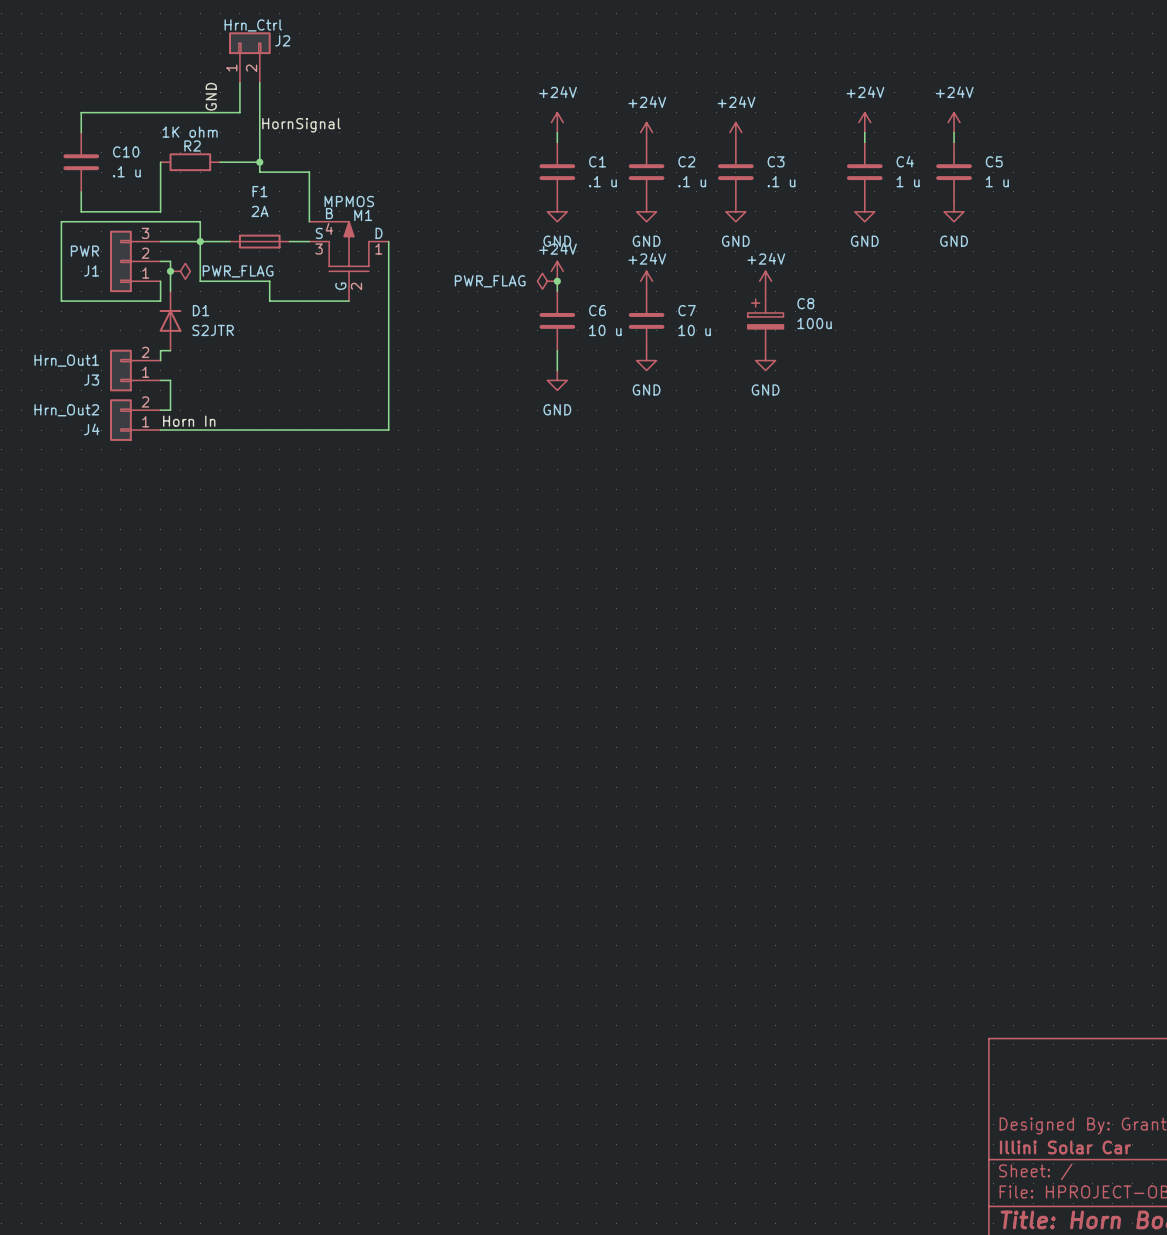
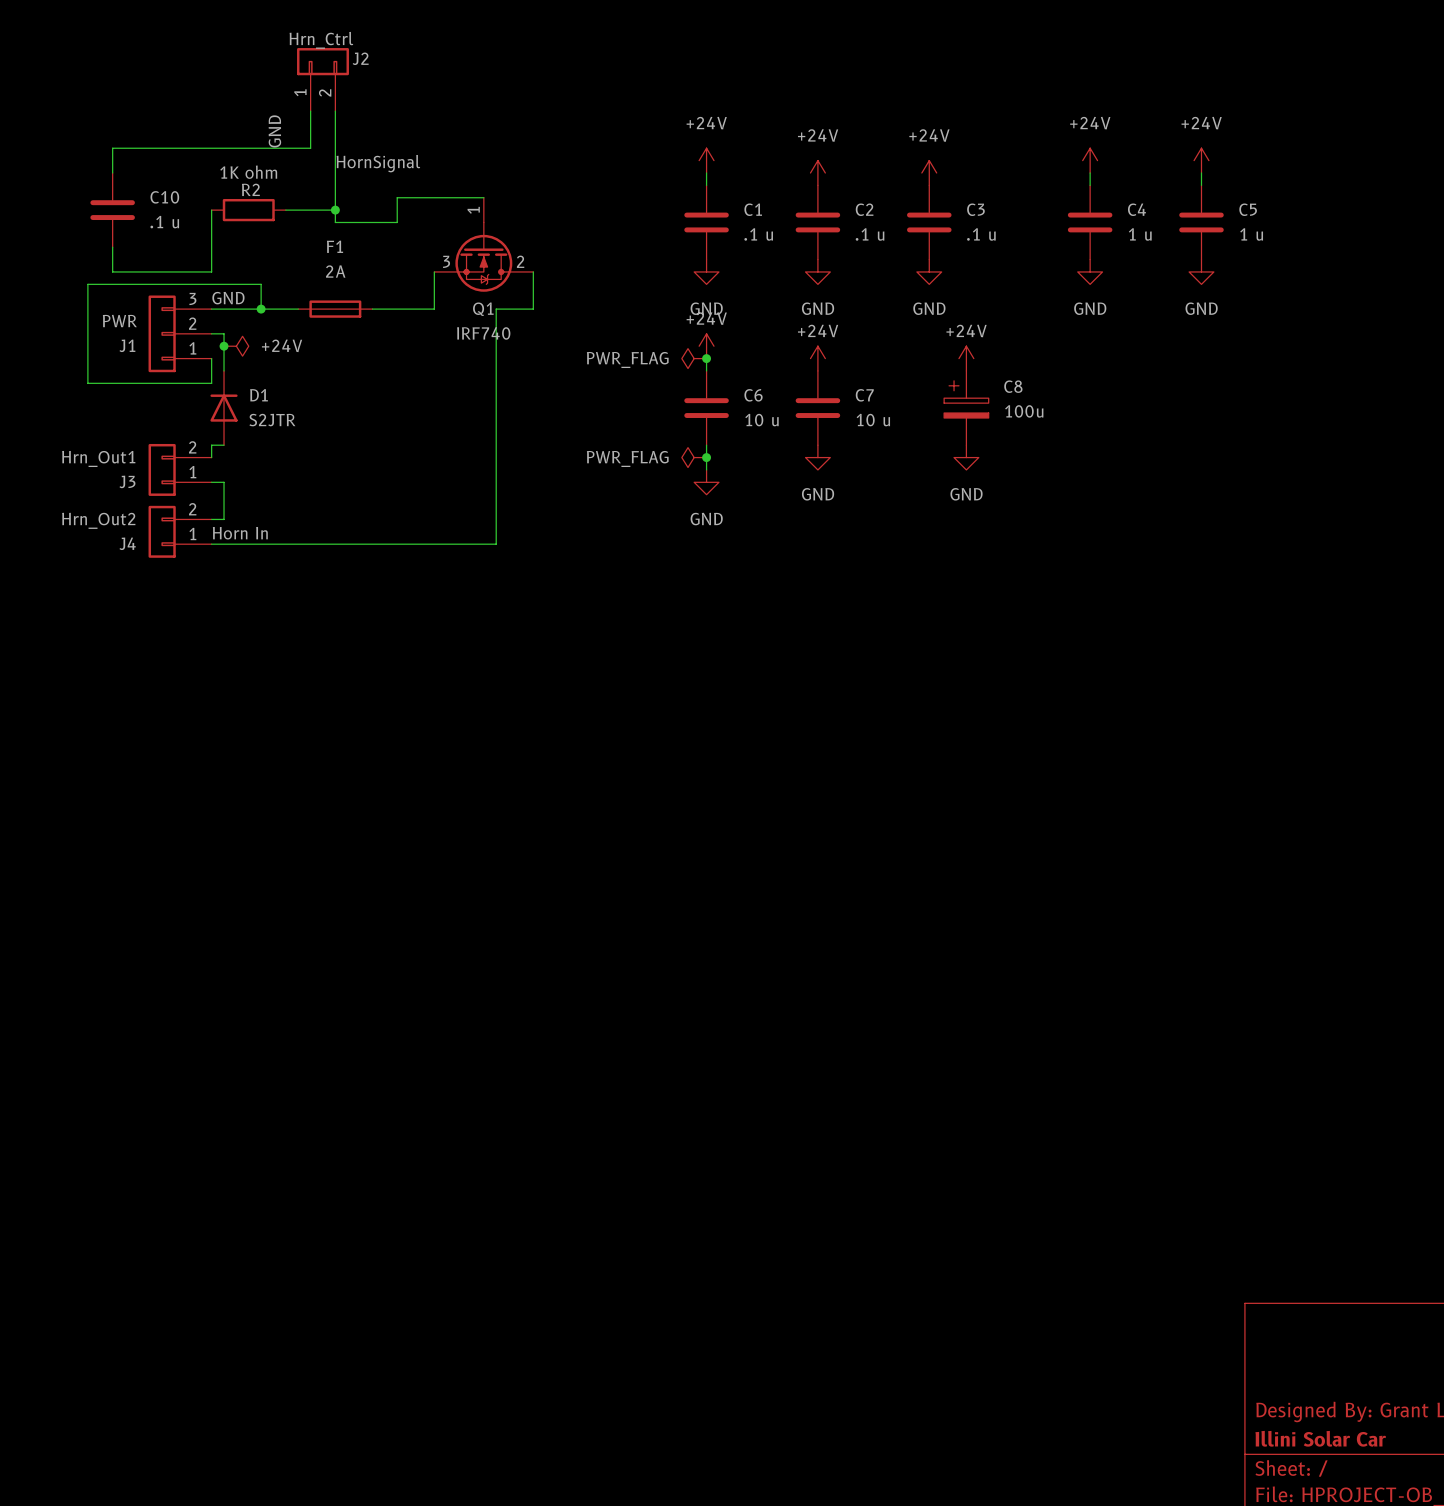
wire: (309, 172) (309, 221) -> (397, 222) (397, 197) (483, 197)
Q1: none -> IRF740 (483, 244)
wire: none -> (434, 271) (434, 309) (397, 309)
wire: none -> (533, 271) (533, 309) (496, 309)
label: none -> GND (228, 298)
wire: (200, 241) (200, 281) (269, 281) (269, 301) (349, 301) -> none
M1: MPMOS (349, 261) -> none
power symbol: PWR_FLAG (180, 271) -> +24V (236, 346)
power symbol: none -> PWR_FLAG (694, 457)
junction: none -> (706, 457)

